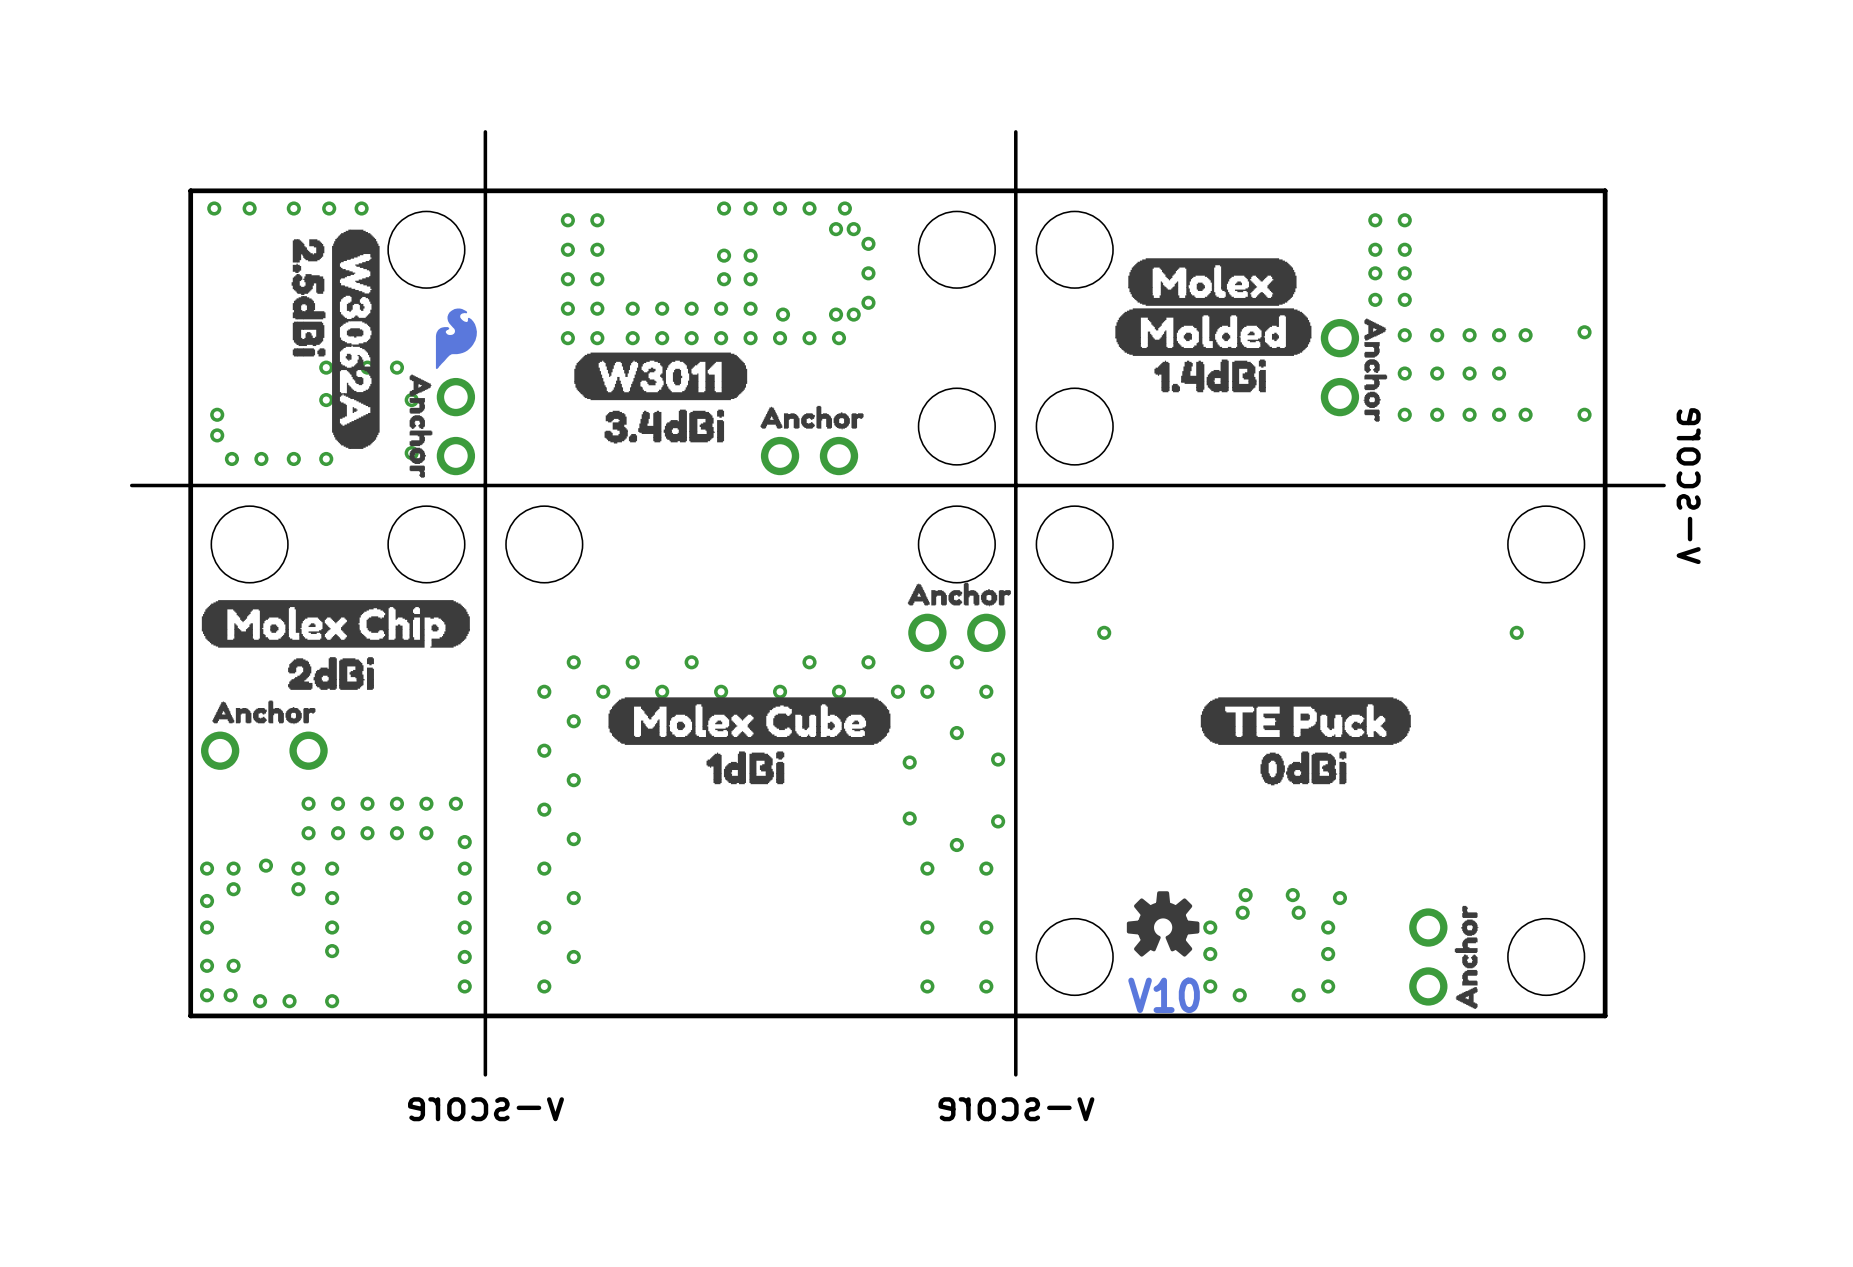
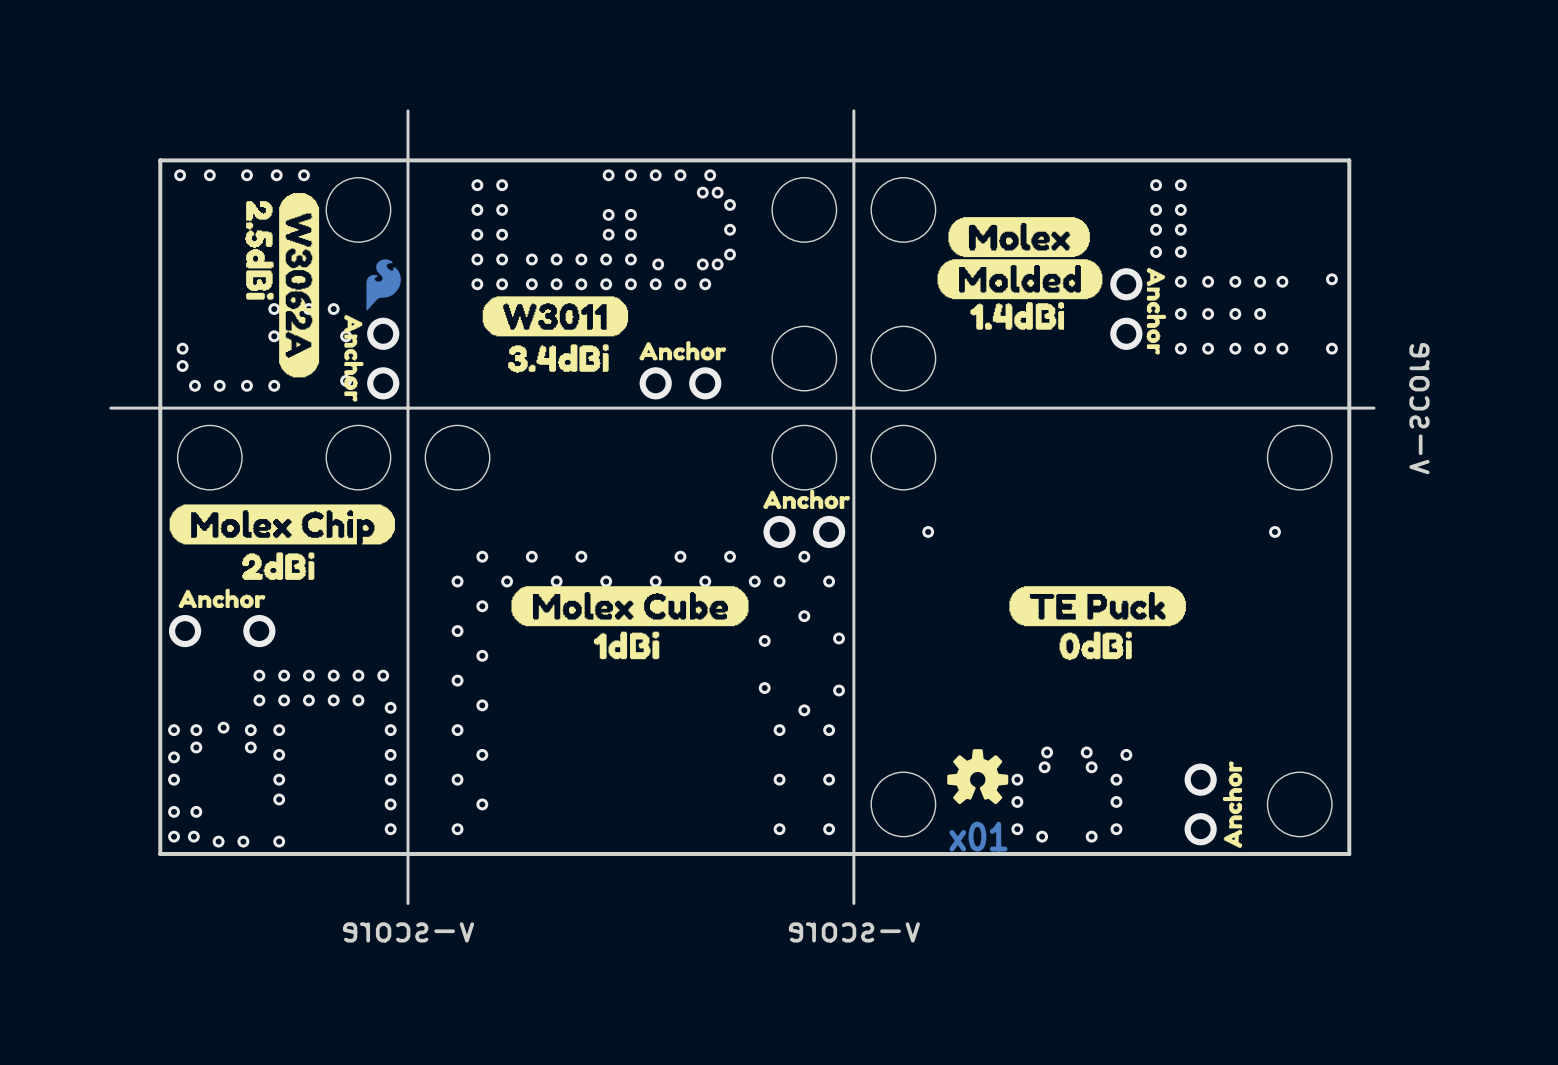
board edge: (1664, 485) (1634, 485) -> none
text: V10 (1164, 995) -> x01 (978, 836)

